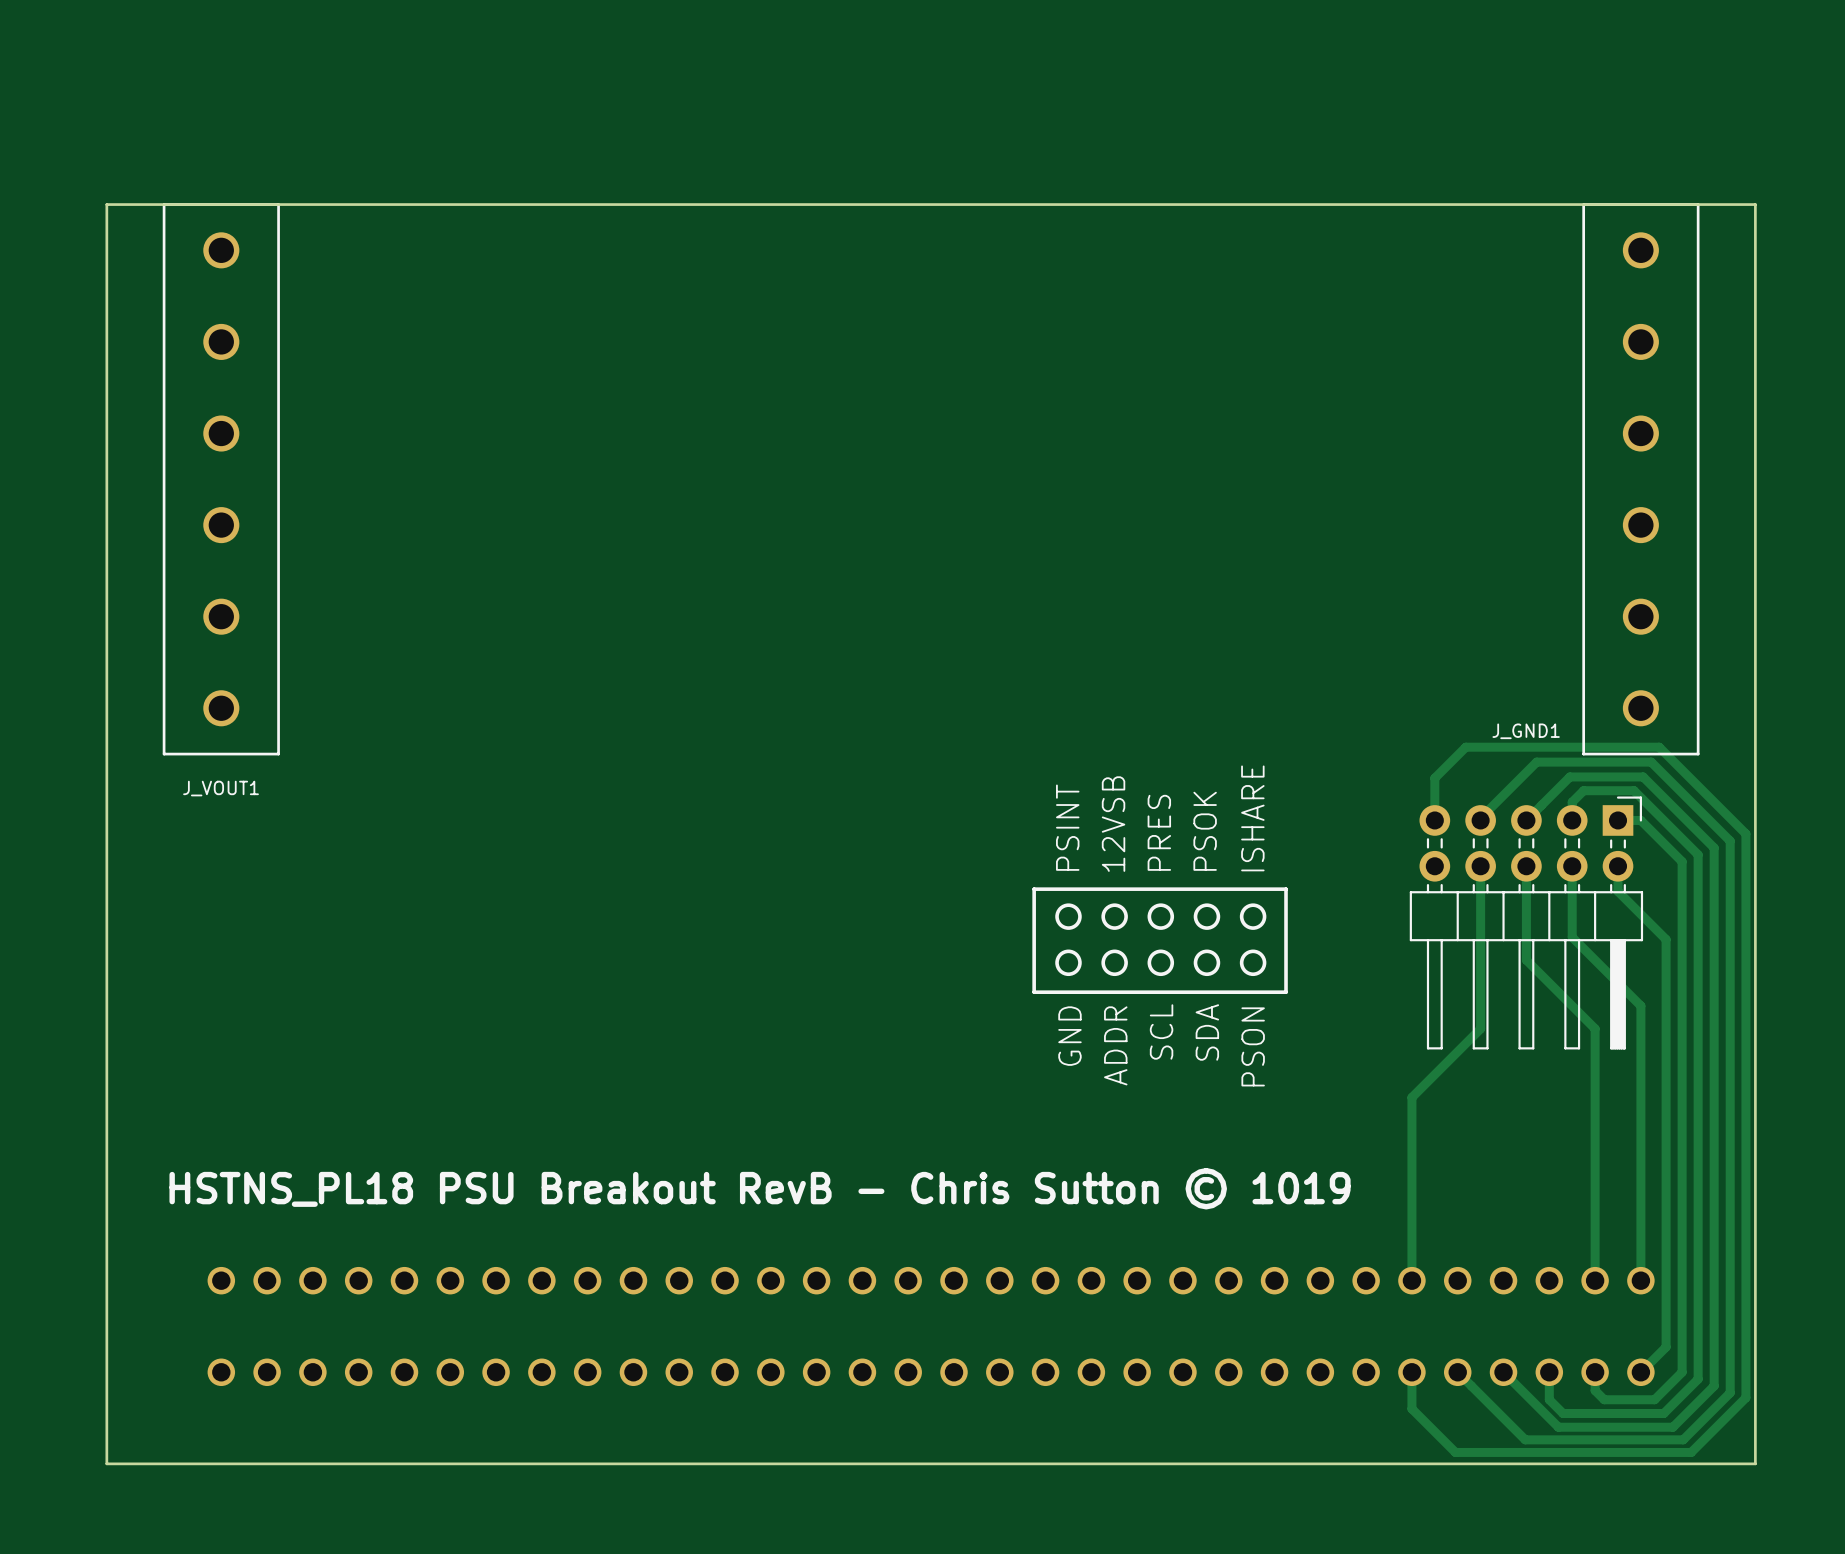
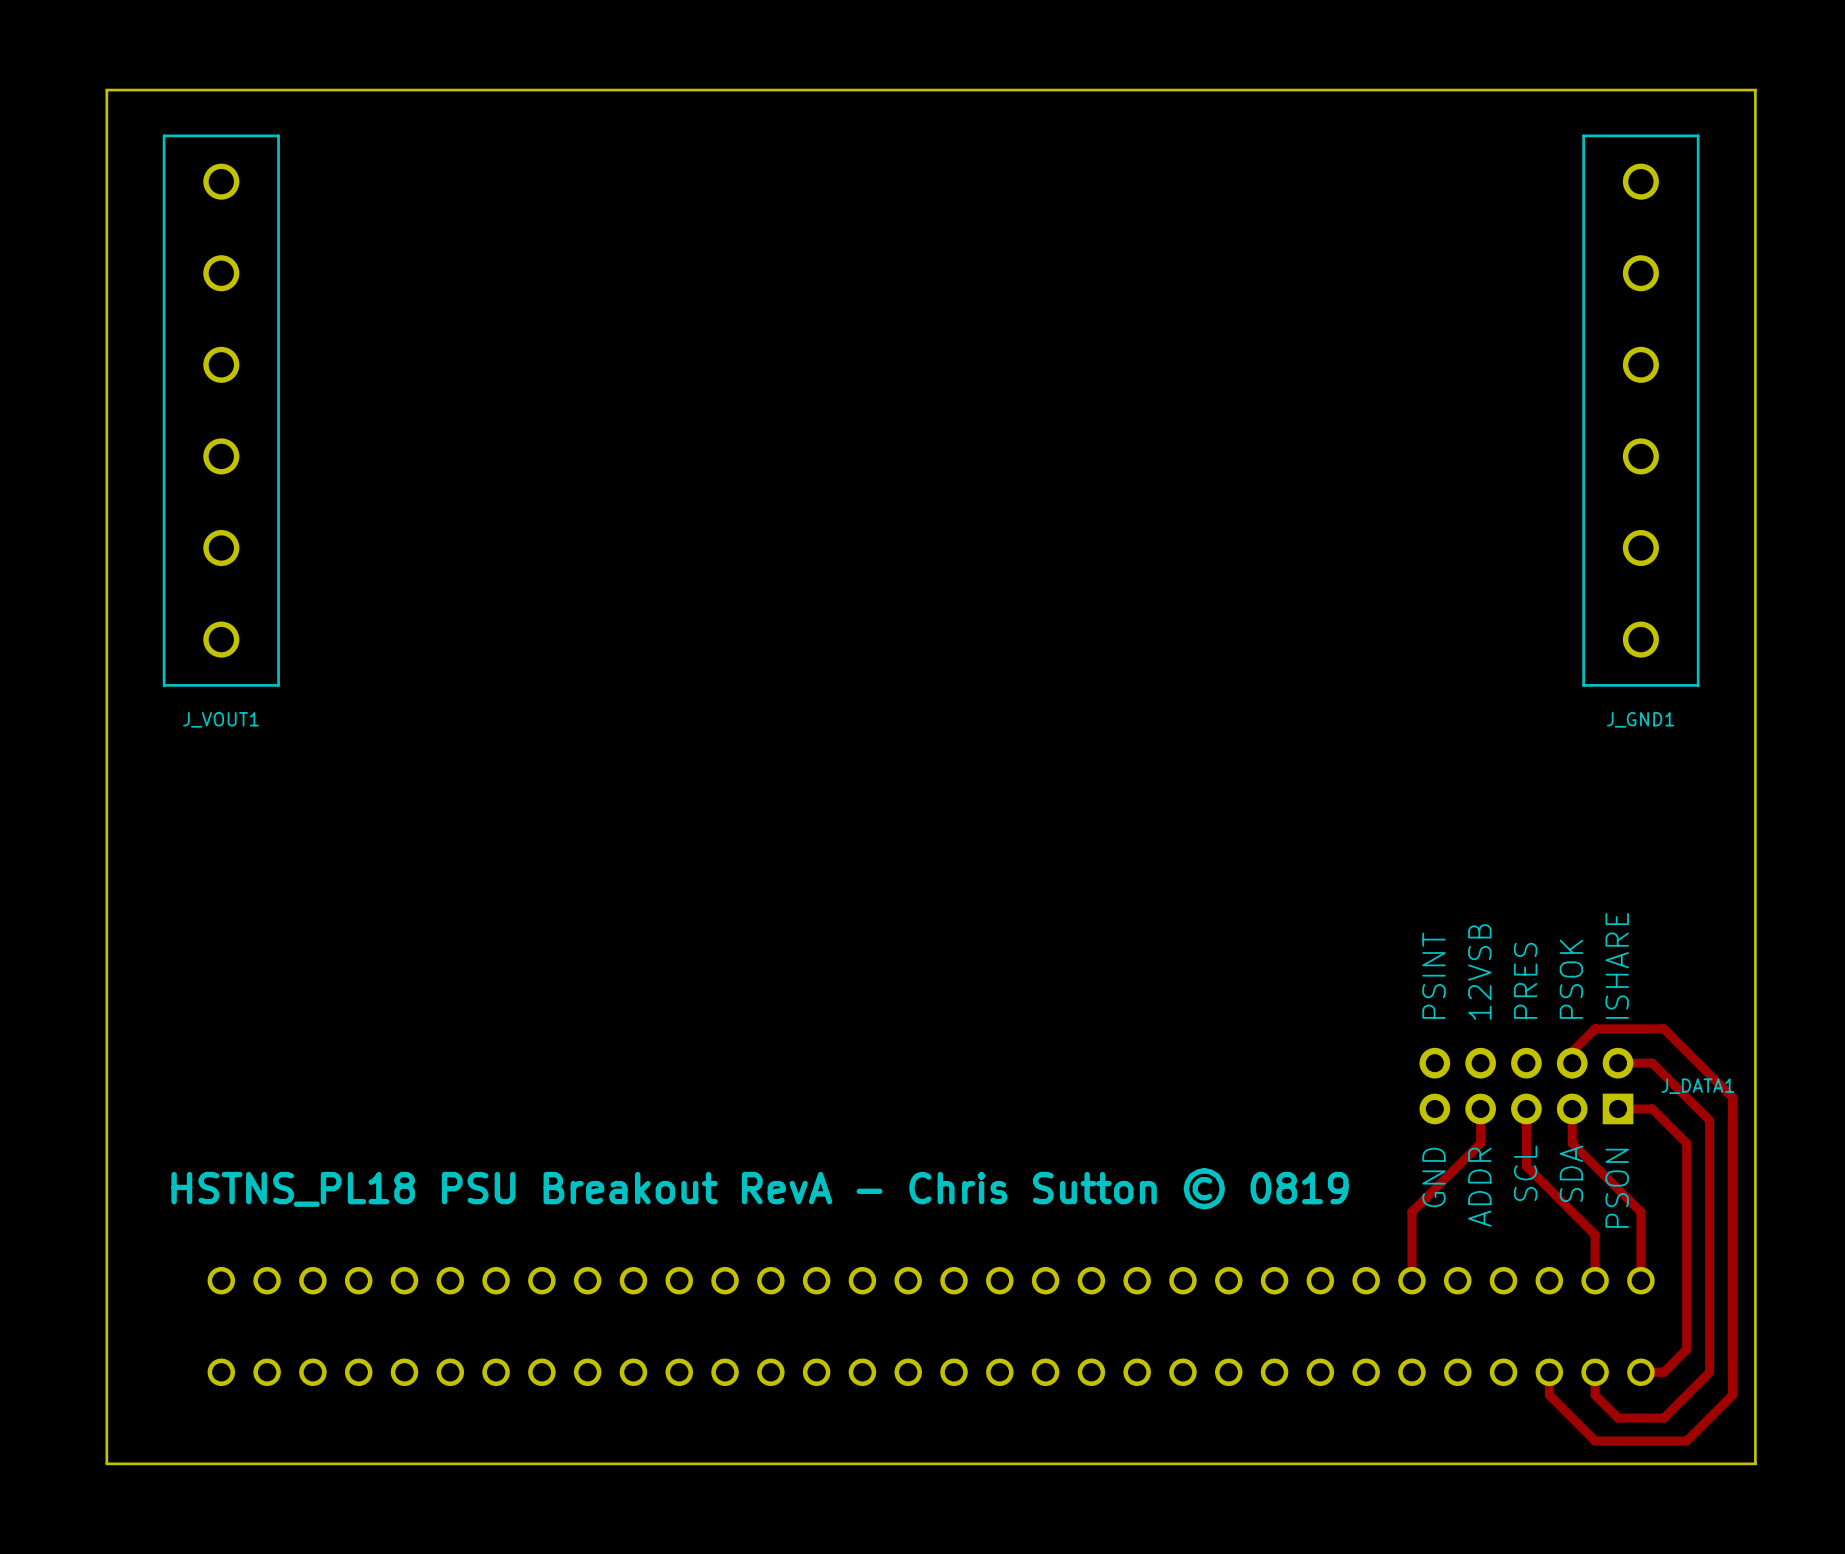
board edge: (106, 204) (1755, 204) -> (106, 204) (106, 90) (1755, 90) (1755, 204)
J_VOUT1 position: (221, 479) -> (221, 410)
J_GND1 position: (1640, 479) -> (1640, 410)
J_GND1 name position: J_GND1 (1526, 731) -> J_GND1 (1640, 719)
text position: ISHARE (1252, 818) -> ISHARE (1617, 965)
track: (1480, 818) (1536, 762) (1651, 762) (1730, 841) (1730, 1392) (1683, 1439) (1525, 1439) (1457, 1372) -> none
track: (1434, 820) (1434, 778) (1465, 747) (1659, 747) (1745, 833) (1745, 1397) (1691, 1452) (1455, 1452) (1411, 1408) (1411, 1372) -> none
track: (1526, 820) (1569, 776) (1643, 776) (1714, 847) (1714, 1386) (1672, 1427) (1558, 1427) (1503, 1372) -> none
track: (1572, 820) (1572, 802) (1583, 790) (1634, 790) (1698, 854) (1698, 1379) (1663, 1413) (1563, 1413) (1549, 1399) (1549, 1395) -> (1572, 1074) (1572, 1051) (1595, 1028) (1663, 1028) (1732, 1097) (1732, 1395) (1686, 1440) (1595, 1440) (1549, 1395)
track: (1618, 820) (1640, 820) (1682, 861) (1682, 1372) (1654, 1399) (1604, 1399) (1595, 1390) -> (1629, 1063) (1652, 1063) (1709, 1120) (1709, 1372) (1663, 1418) (1618, 1418) (1595, 1395) (1595, 1390)
text position: 12VSB (1113, 824) -> 12VSB (1479, 972)
text position: PSINT (1067, 827) -> PSINT (1434, 975)
text position: PSOK (1205, 831) -> PSOK (1571, 979)
text position: PRES (1159, 832) -> PRES (1525, 980)
track: (1618, 863) (1618, 891) (1666, 939) (1666, 1347) (1640, 1372) -> (1629, 1108) (1652, 1108) (1686, 1143) (1686, 1349) (1663, 1372) (1640, 1372)
track: (1480, 866) (1480, 1028) (1411, 1097) (1411, 1212) -> (1480, 1108) (1480, 1143) (1411, 1212)
track: (1526, 866) (1526, 960) (1595, 1028) (1595, 1234) -> (1526, 1120) (1526, 1166) (1595, 1234)
track: (1574, 868) (1572, 870) (1572, 937) (1640, 1005) (1640, 1212) -> (1572, 1120) (1572, 1143) (1640, 1212)
line: (1034, 889) (1034, 992) (1286, 992) (1286, 889) (1034, 889) -> none
drawing: [1055, 903, 1267, 977] -> none
J_DATA1 side: top (1526, 922) -> bottom (1526, 1086)
text position: SCL (1161, 1031) -> SCL (1525, 1173)
text position: SDA (1207, 1032) -> SDA (1571, 1173)
text position: GND (1069, 1036) -> GND (1434, 1177)
text position: ADDR (1115, 1045) -> ADDR (1479, 1187)
text position: PSON (1253, 1046) -> PSON (1617, 1188)
text: HSTNS_PL18 PSU Breakout RevB - Chris Sutton © 1019 (760, 1188) -> HSTNS_PL18 PSU Breakout RevA - Chris Sutton © 0819 (760, 1188)

